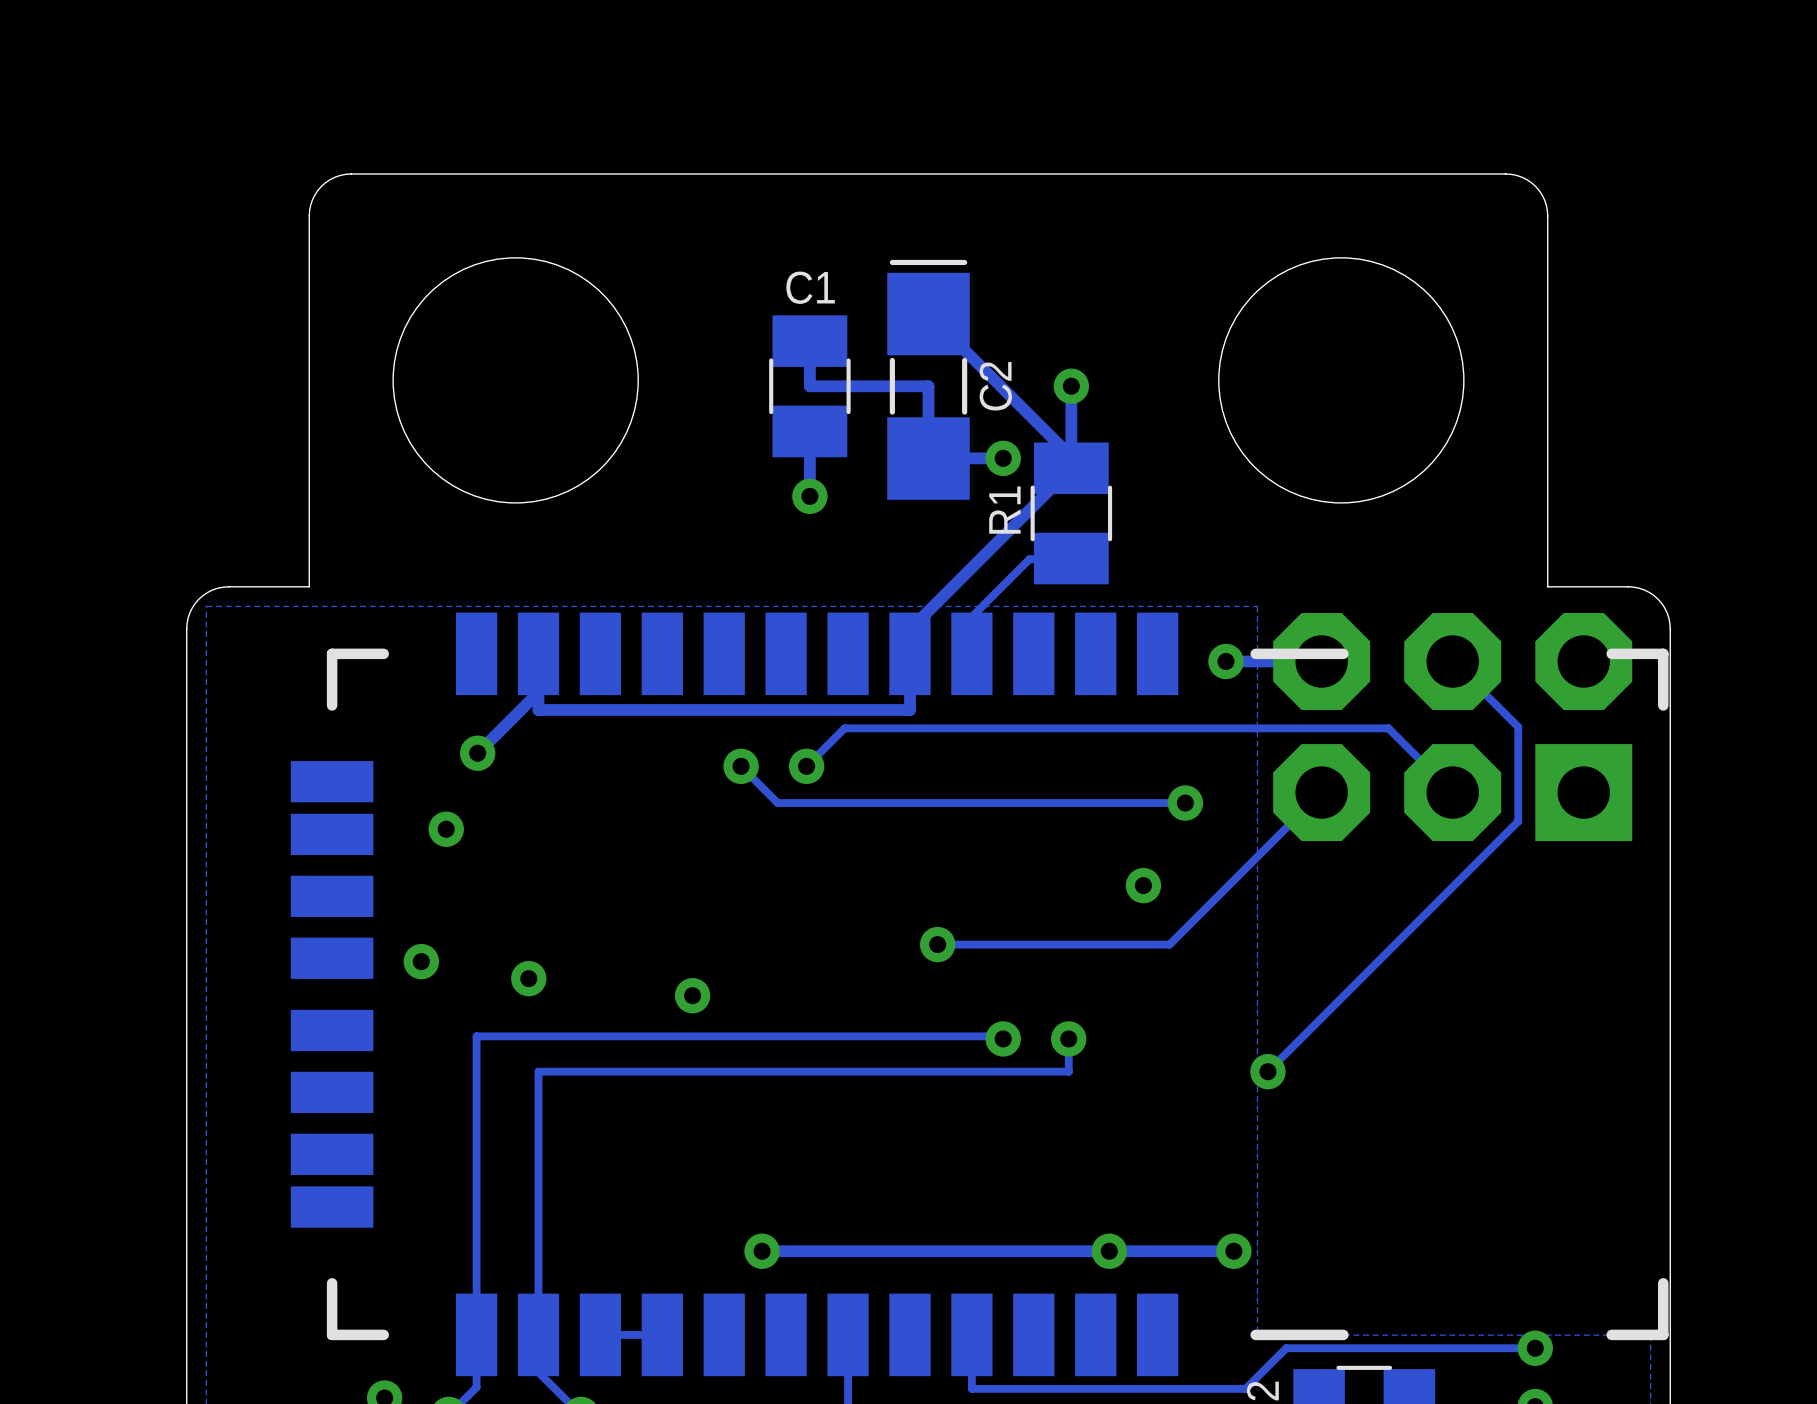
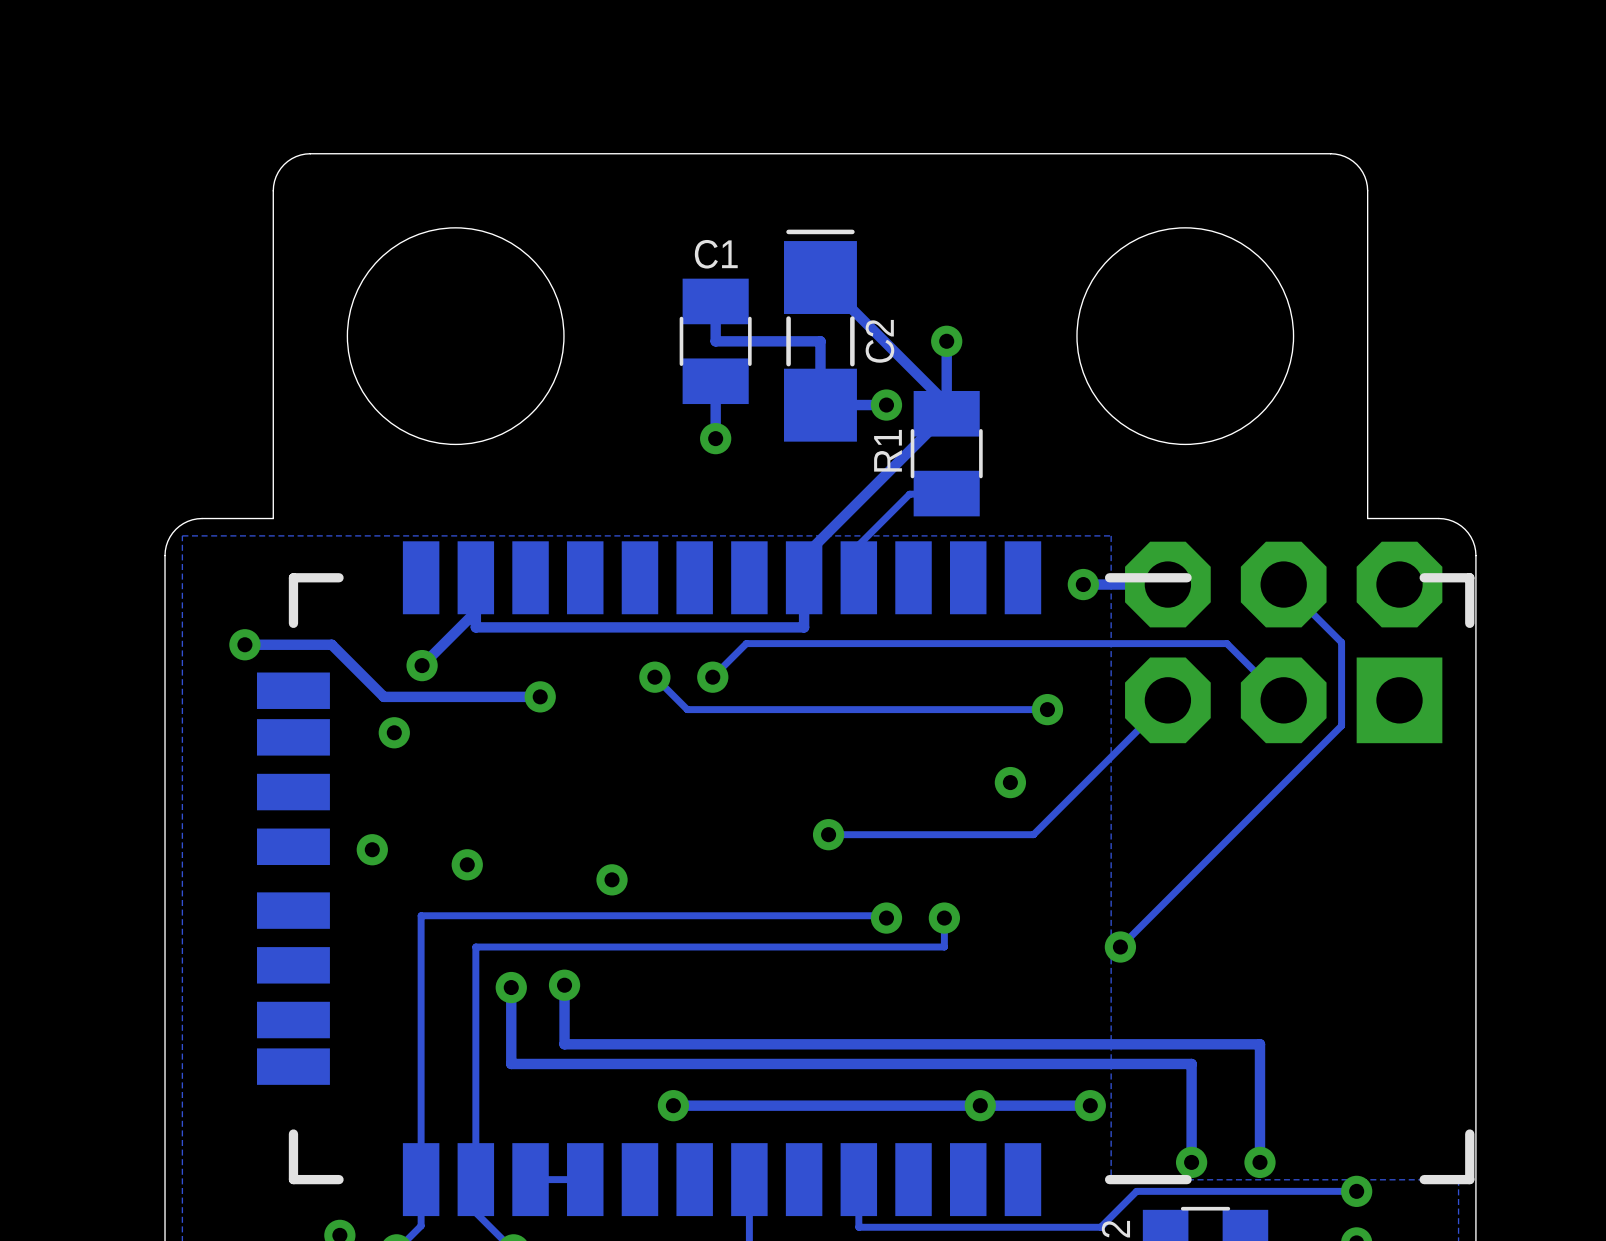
track: none -> (244, 644) (331, 644) (383, 696) (540, 696)
via: none -> (244, 644)
via: none -> (540, 696)
track: none -> (564, 985) (564, 1044) (1259, 1044) (1259, 1162)
via: none -> (564, 985)
track: none -> (511, 987) (511, 1063) (1191, 1063) (1191, 1162)
via: none -> (511, 987)
via: none -> (1191, 1162)
via: none -> (1259, 1162)

